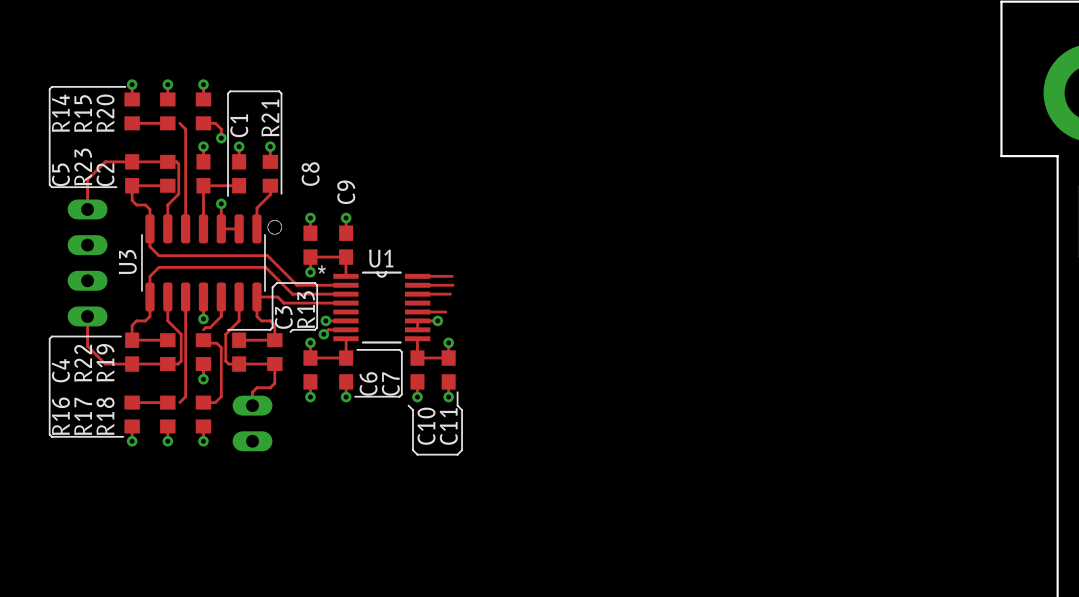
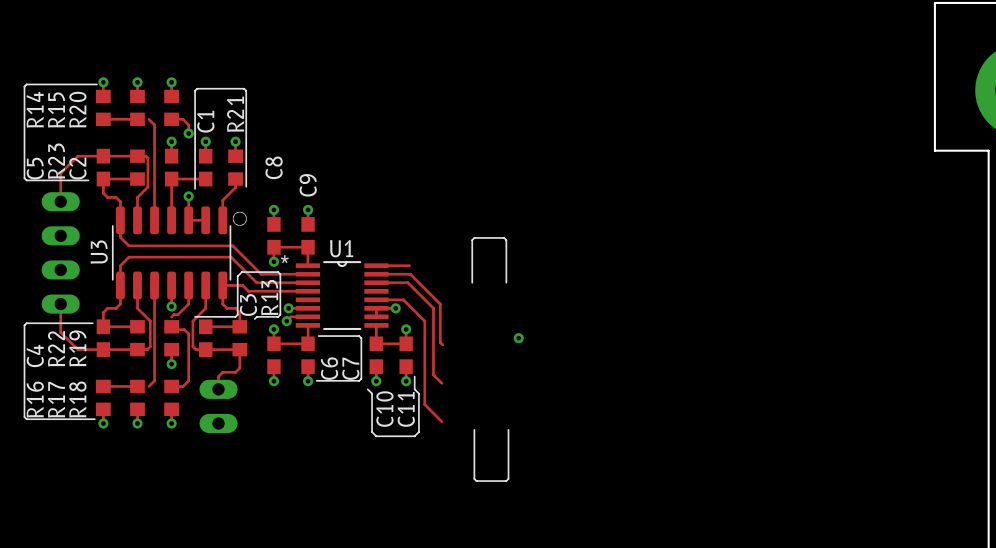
track: none -> (410, 274) (440, 304) (440, 342) (442, 344)
track: none -> (407, 282) (433, 308) (433, 374) (441, 383)
line: none -> (472, 282) (472, 240) (474, 237) (504, 237) (506, 240) (506, 282)
track: none -> (403, 299) (424, 321) (424, 404) (441, 421)
via: none -> (518, 338)
line: none -> (474, 429) (474, 478) (476, 481) (506, 481) (508, 478) (508, 429)

